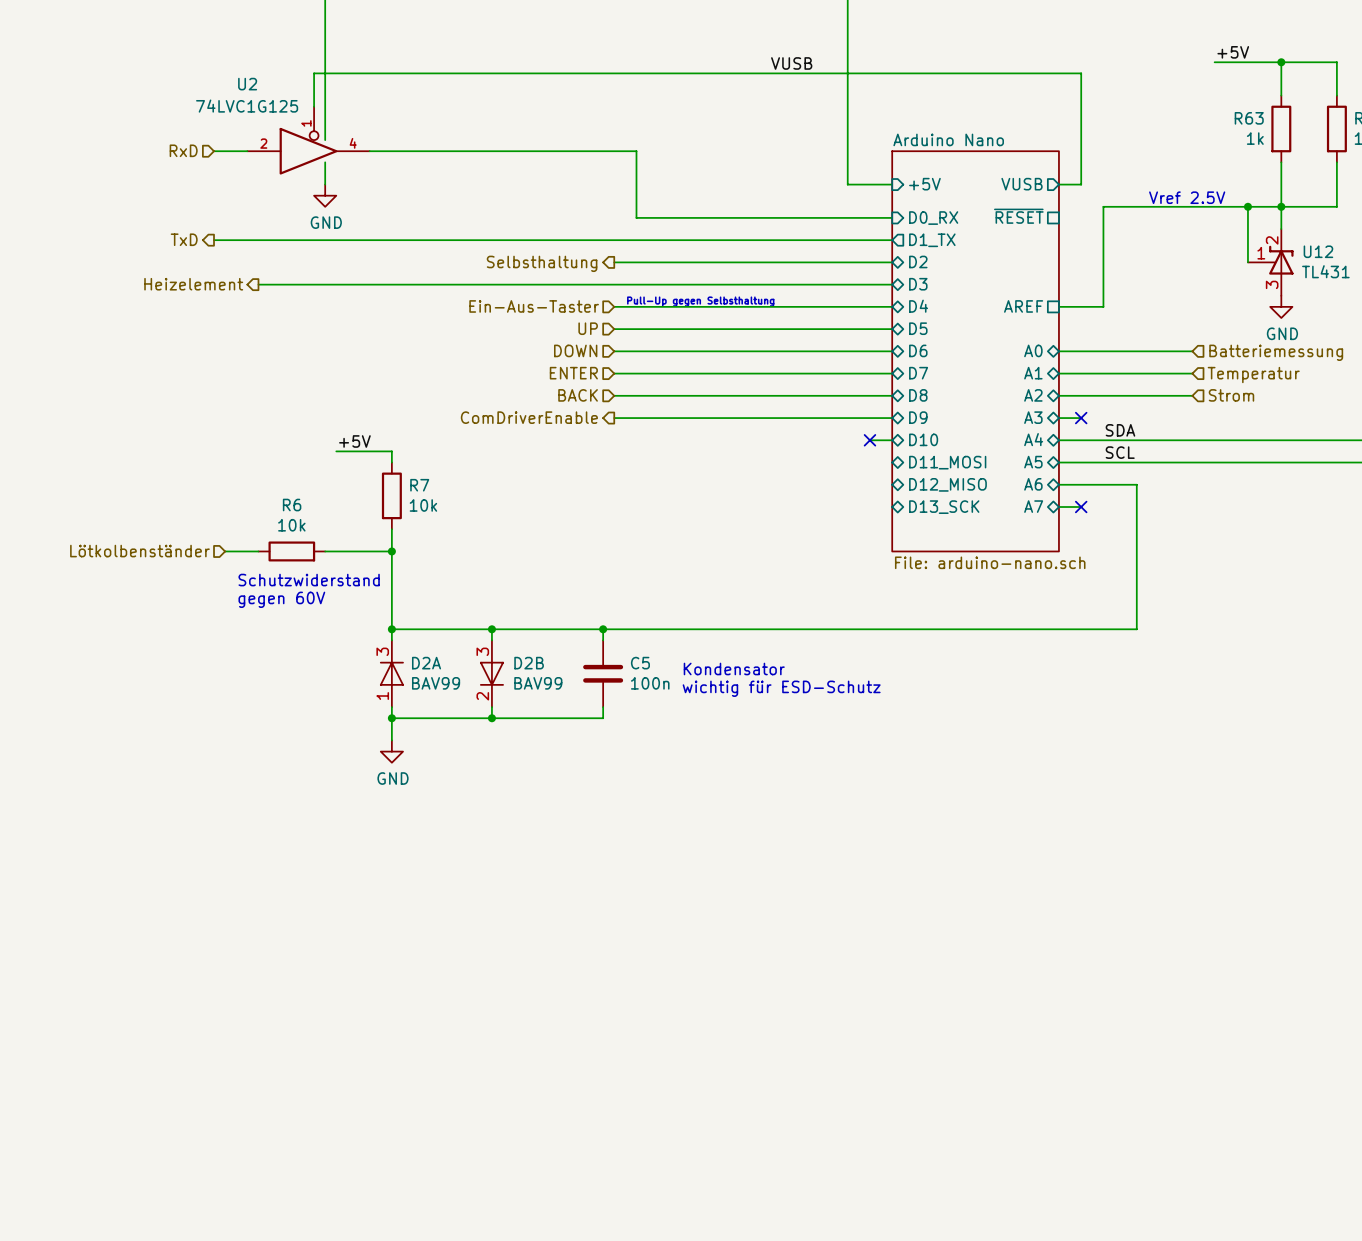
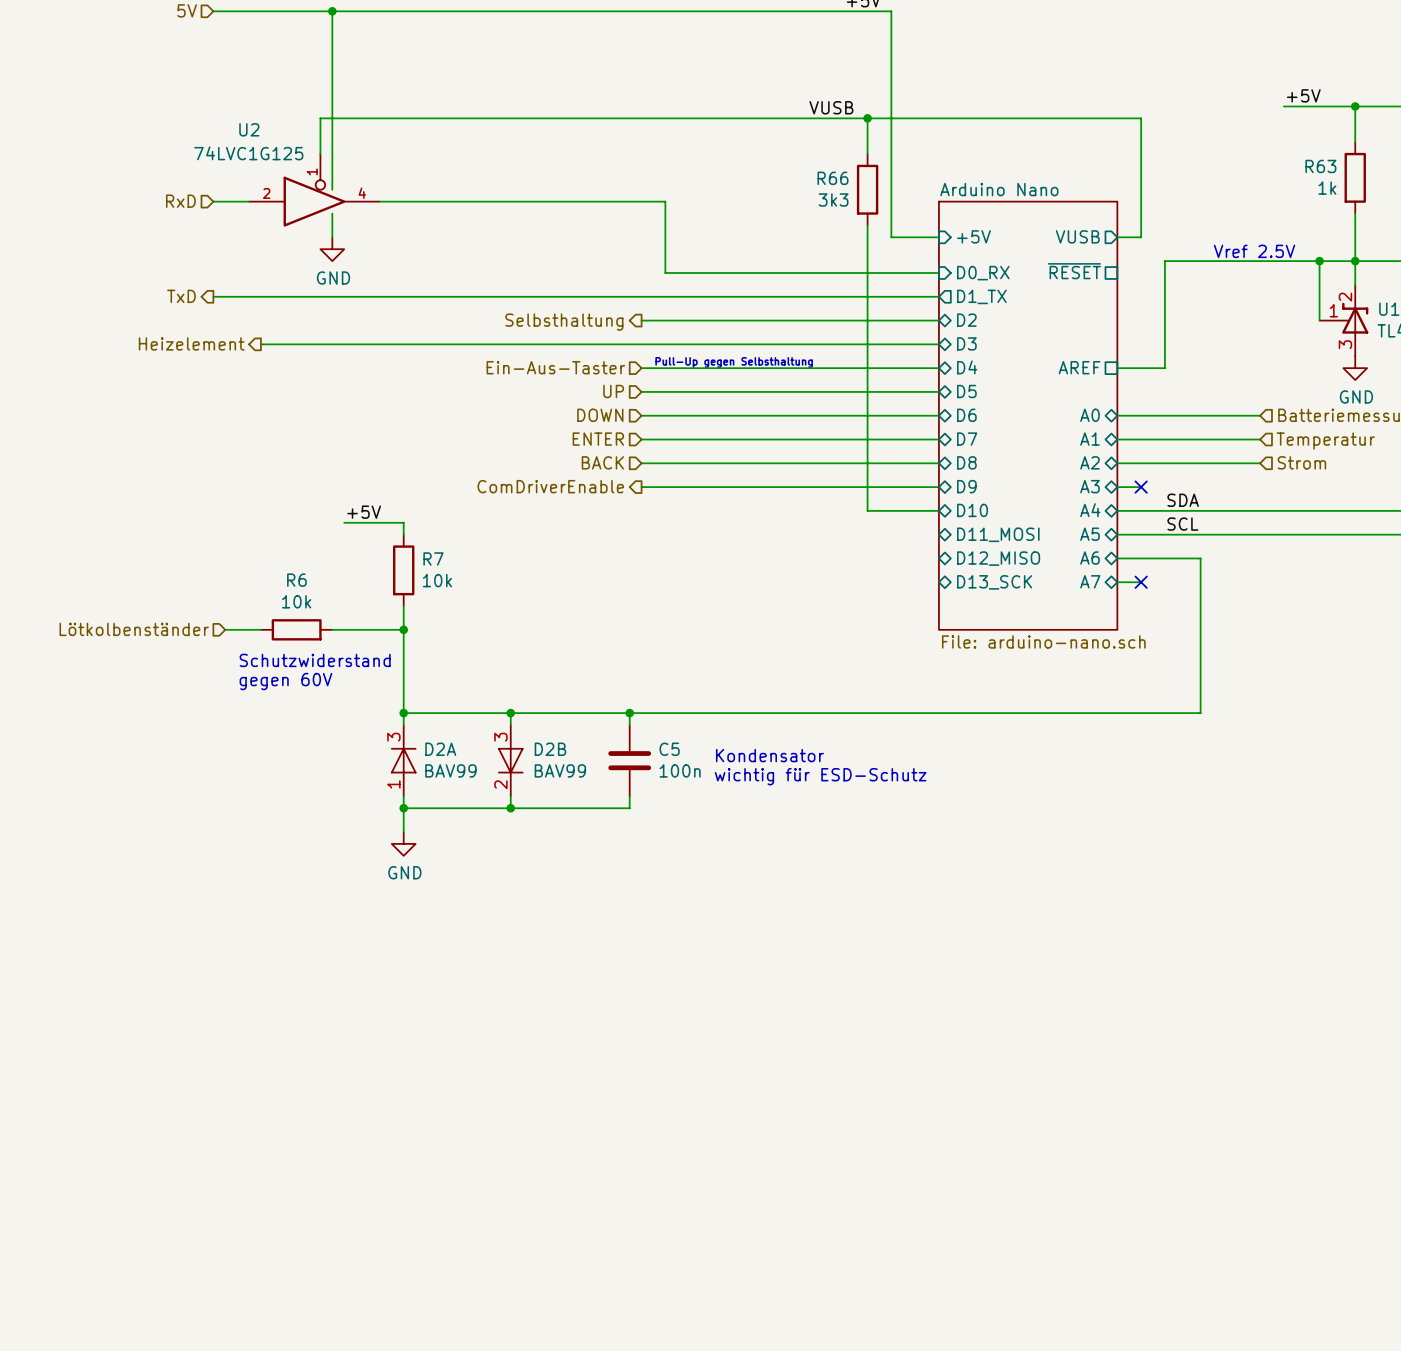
wire: none -> (867, 118) (867, 154)
junction: none -> (867, 118)
R66: none -> 3k3 (867, 189)
wire: none -> (867, 225) (867, 510) (915, 510)
no-connect mark: (869, 440) -> none

